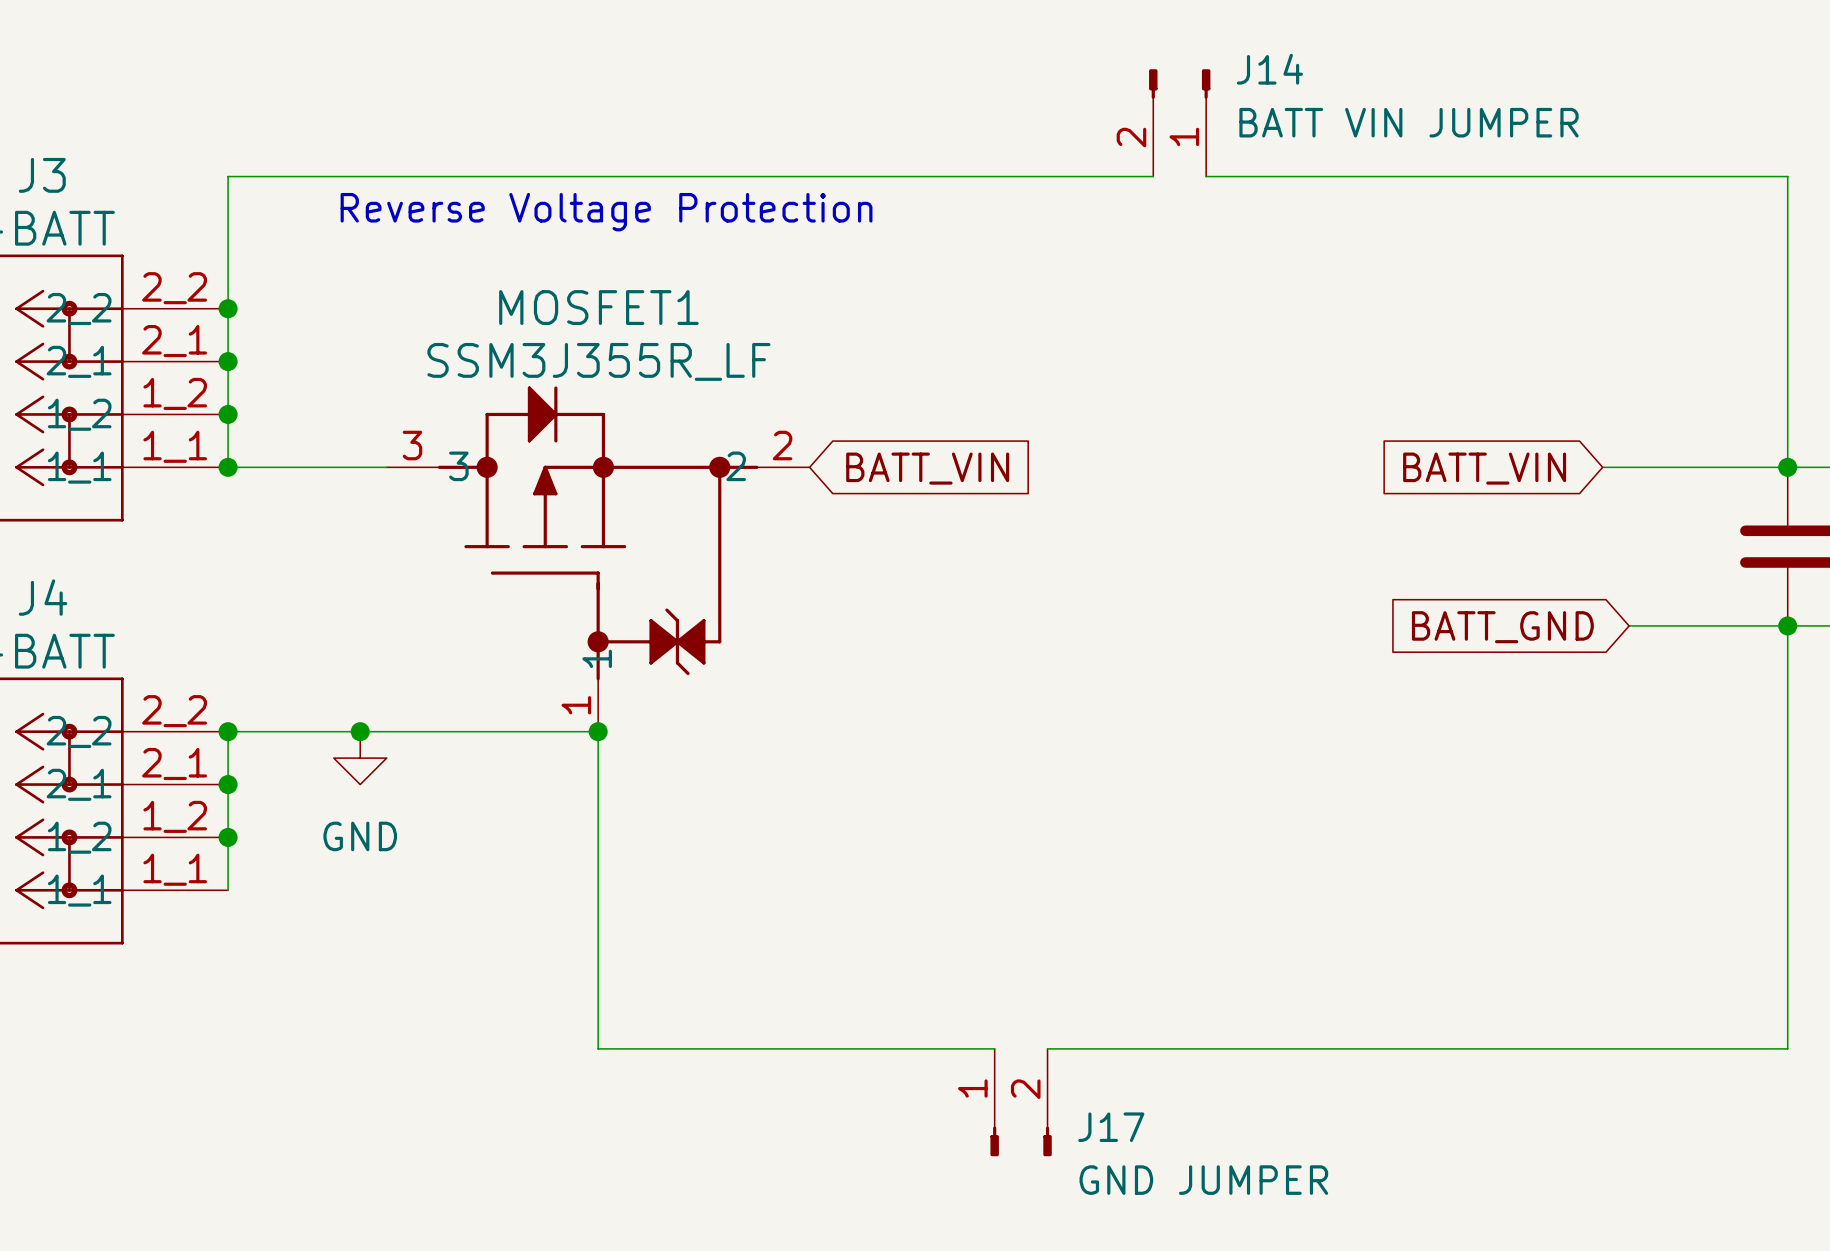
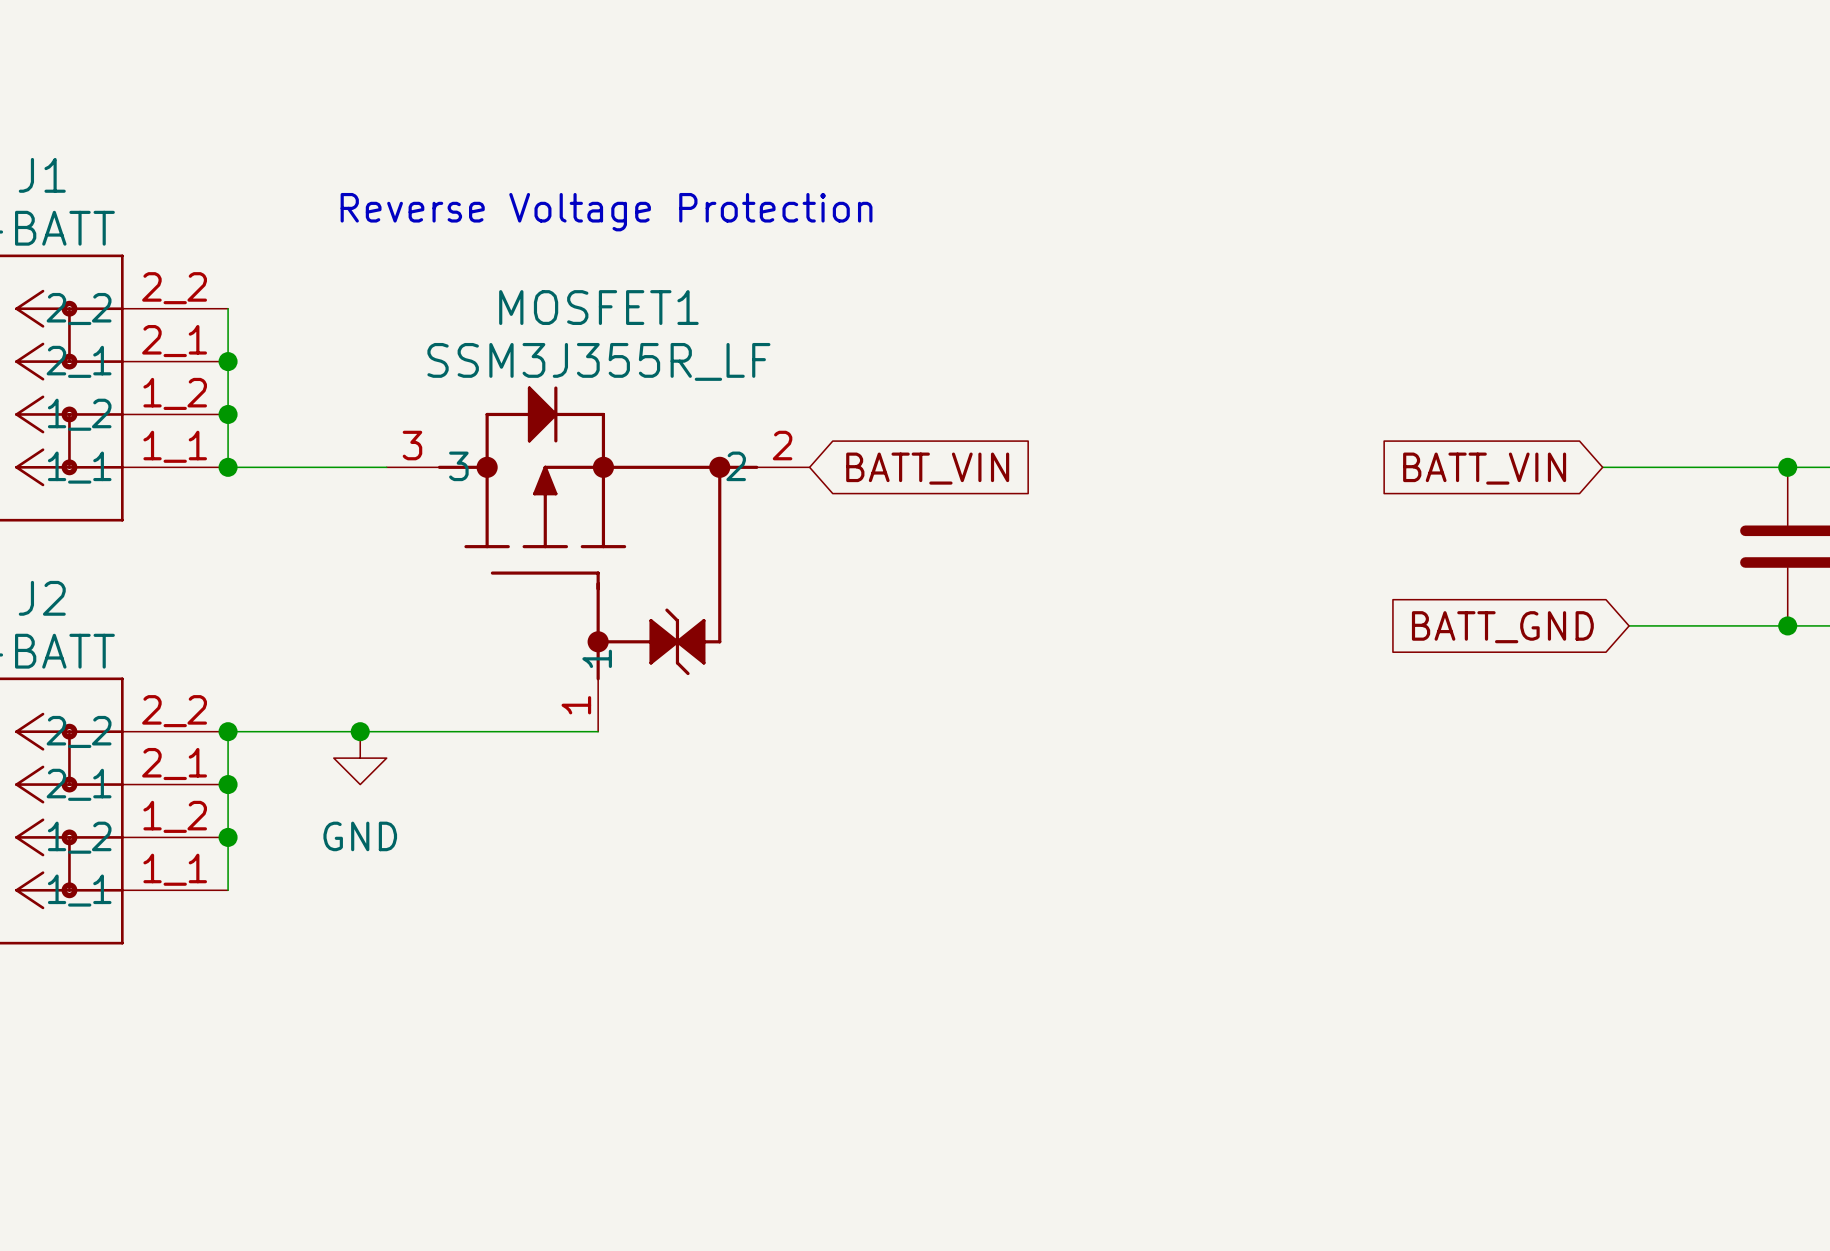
J14: BATT VIN JUMPER (1179, 122) -> none
J3 name: J3 (42, 175) -> J1 (42, 175)
wire: (1153, 176) (228, 176) (228, 308) -> none
wire: (1206, 176) (1787, 176) (1787, 467) -> none
junction: (228, 308) -> none
J4 name: J4 (43, 597) -> J2 (42, 598)
wire: (1787, 625) (1787, 1048) (1047, 1048) -> none
wire: (598, 731) (598, 1048) (994, 1048) -> none
junction: (598, 731) -> none
J17: GND JUMPER (1021, 1102) -> none

